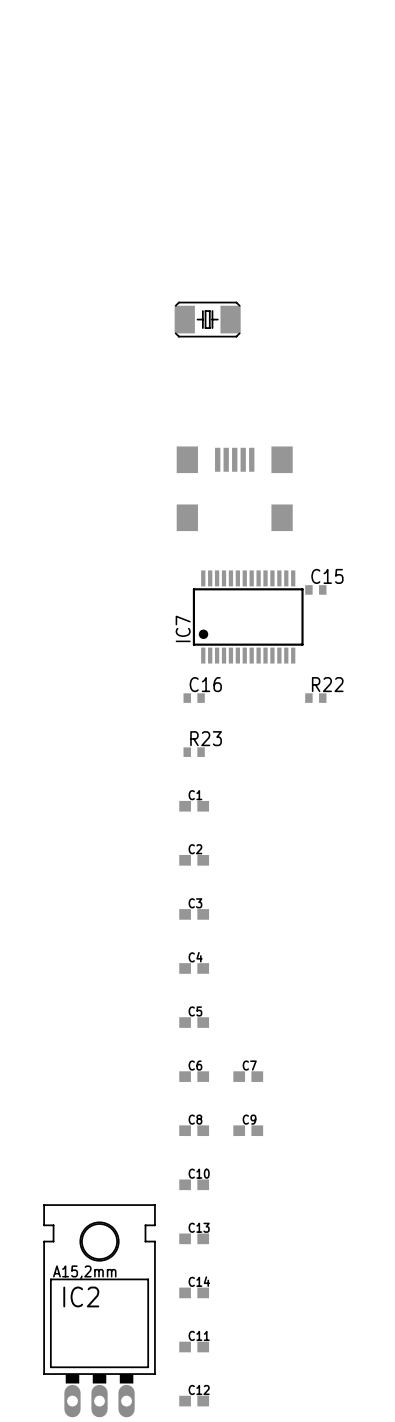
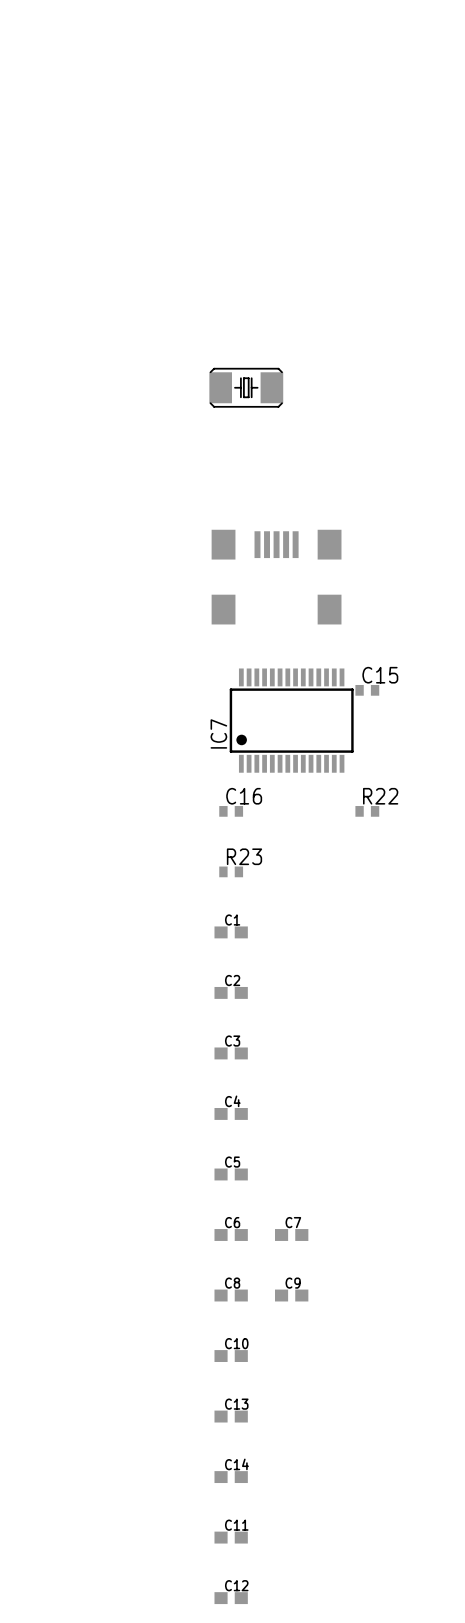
IC2: (99, 1310) -> none

